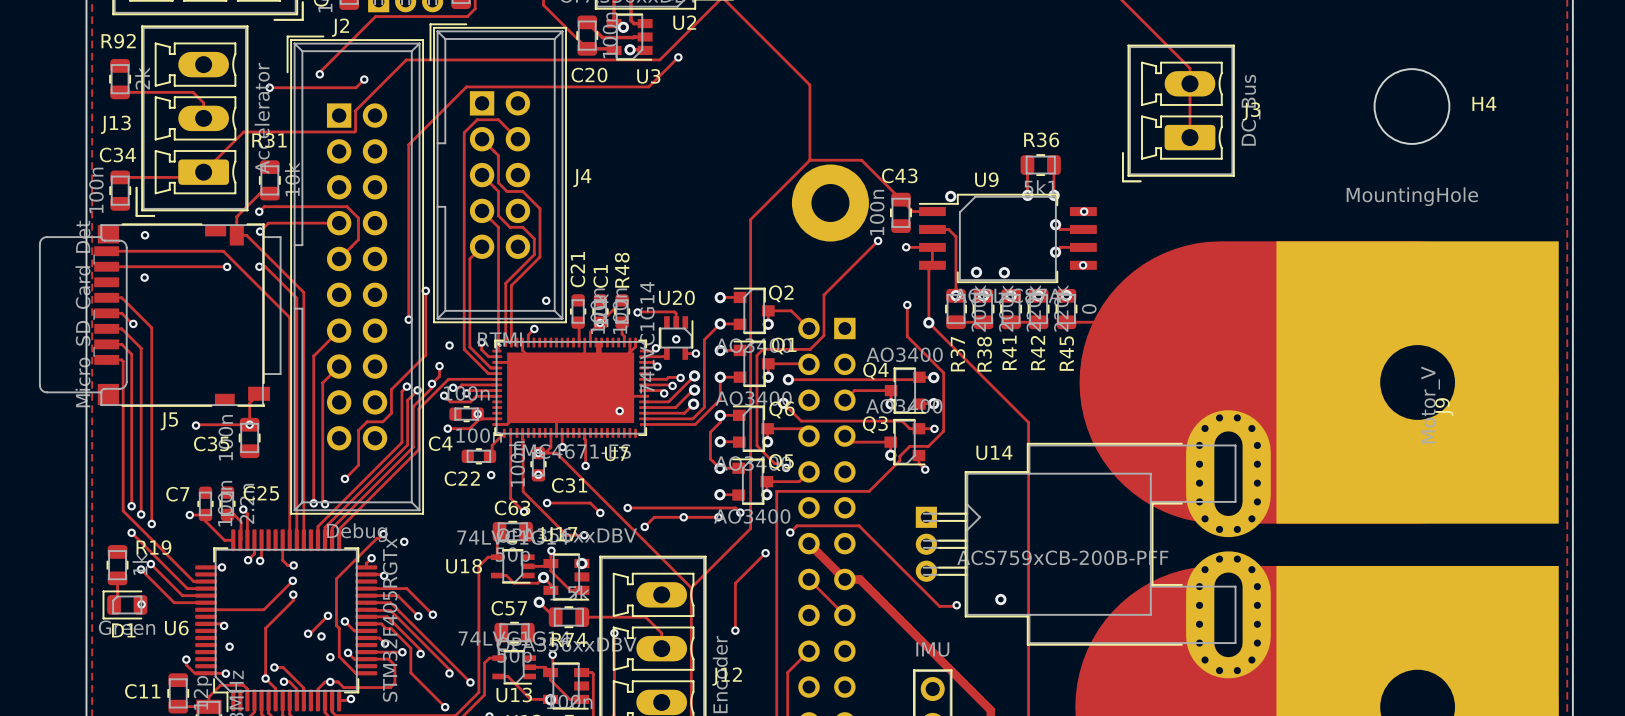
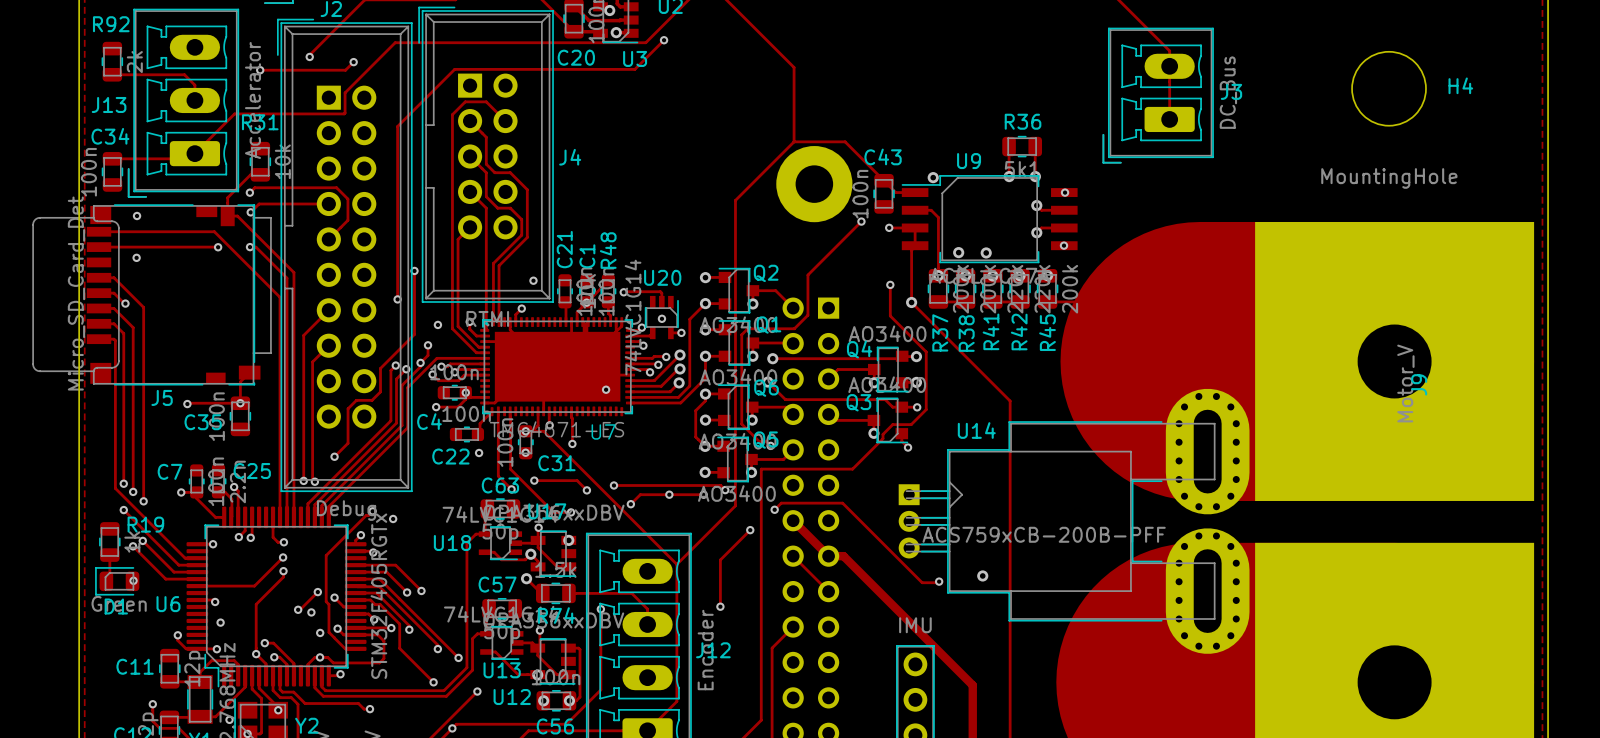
R45 value: 0 (1089, 309) -> 200k (1070, 289)

